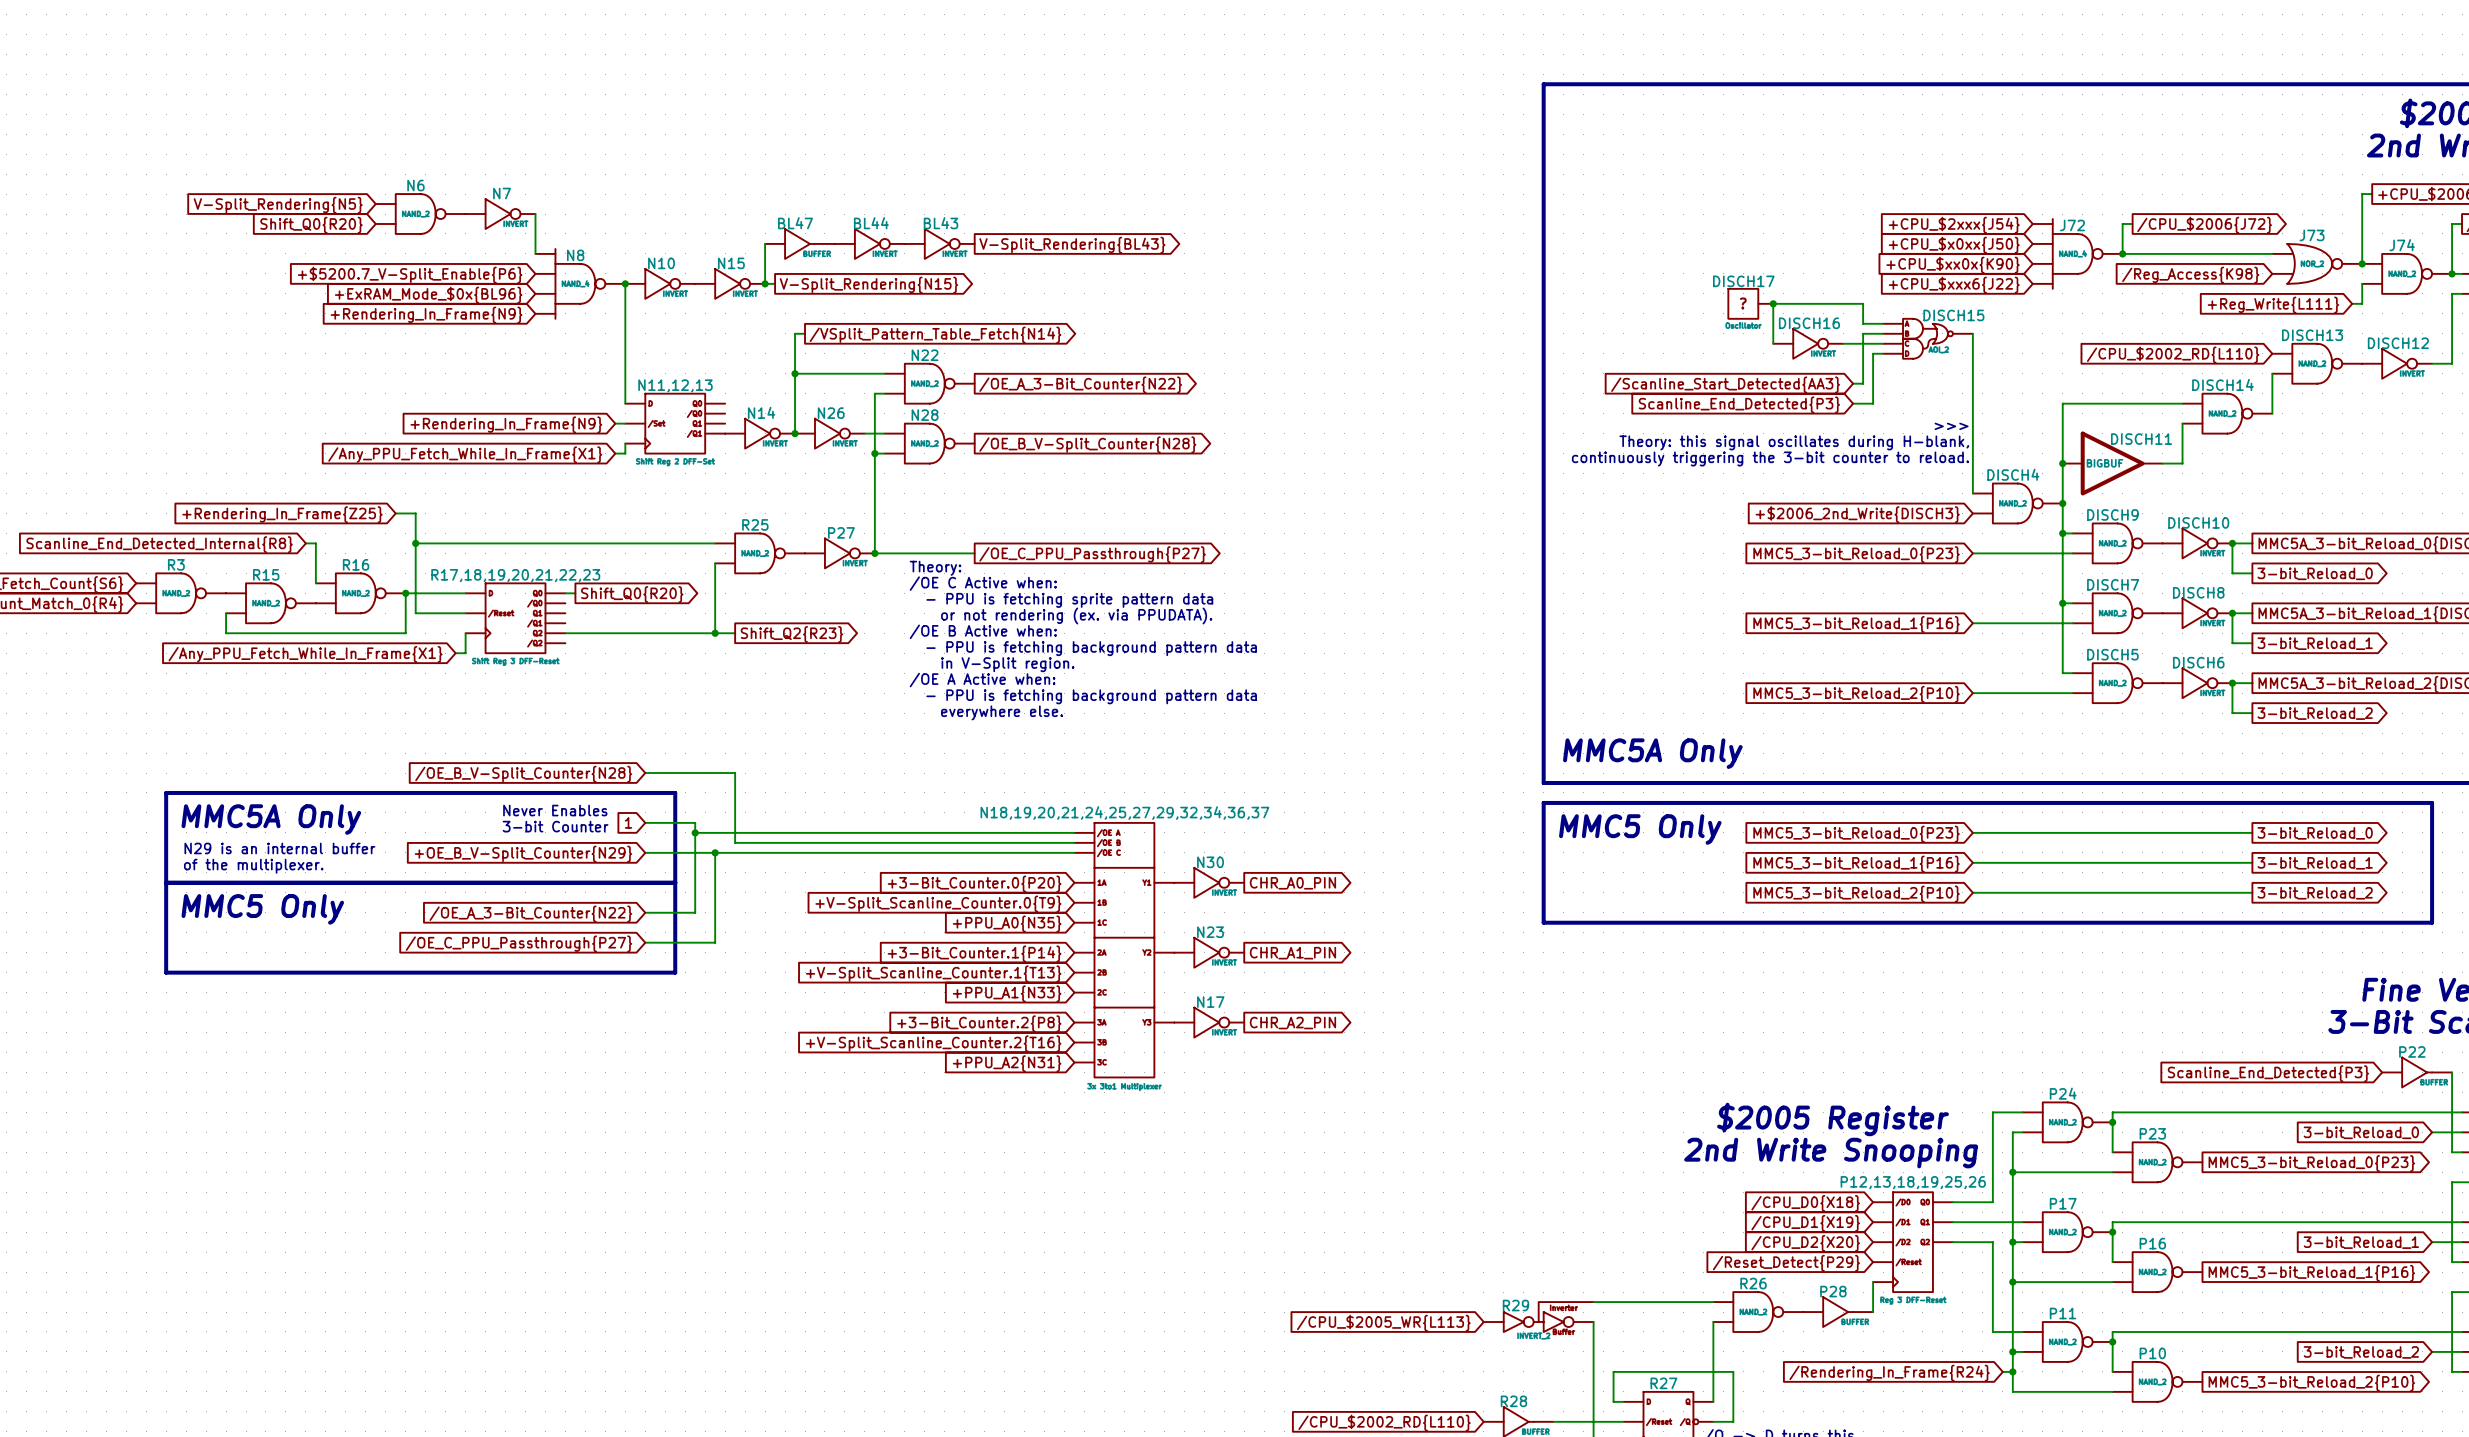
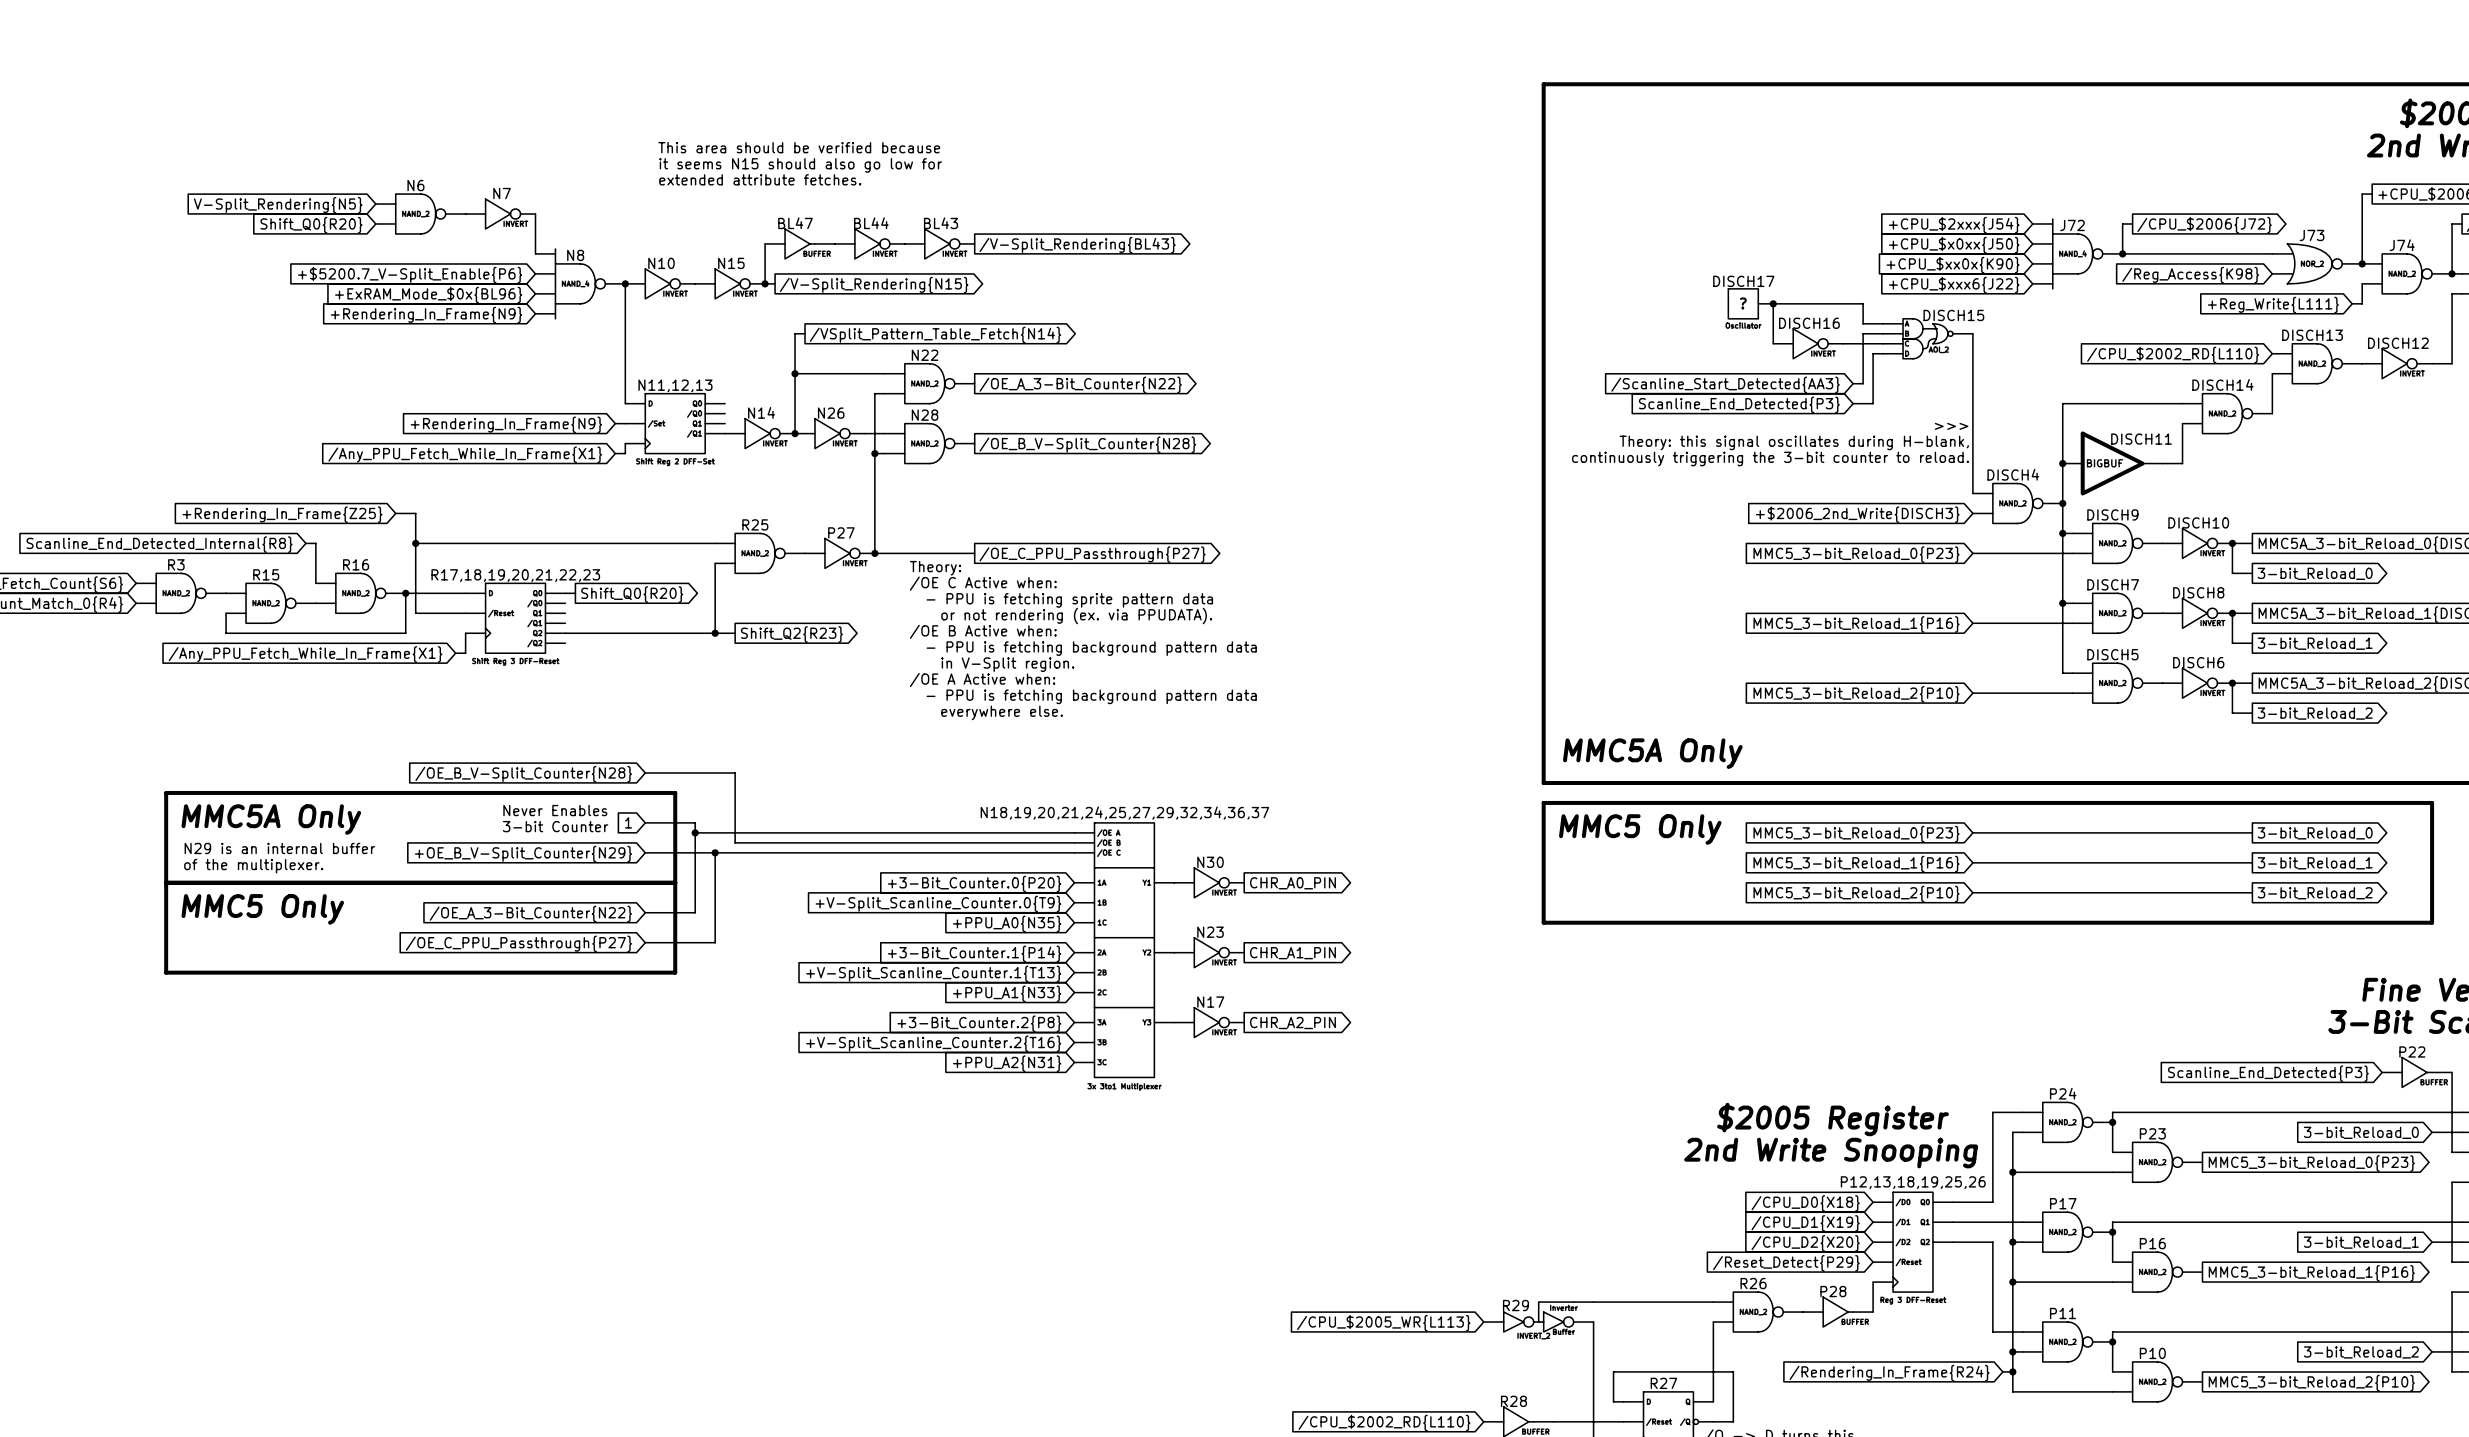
text: none -> This area should be verified because (799, 147)
text: none -> it seems N15 should also go low for (800, 165)
text: none -> extended attribute fetches. (760, 179)
global label: V-Split_Rendering{BL43} (1072, 245) -> /V-Split_Rendering{BL43} (1077, 245)
global label: V-Split_Rendering{N15} (868, 285) -> /V-Split_Rendering{N15} (874, 285)

